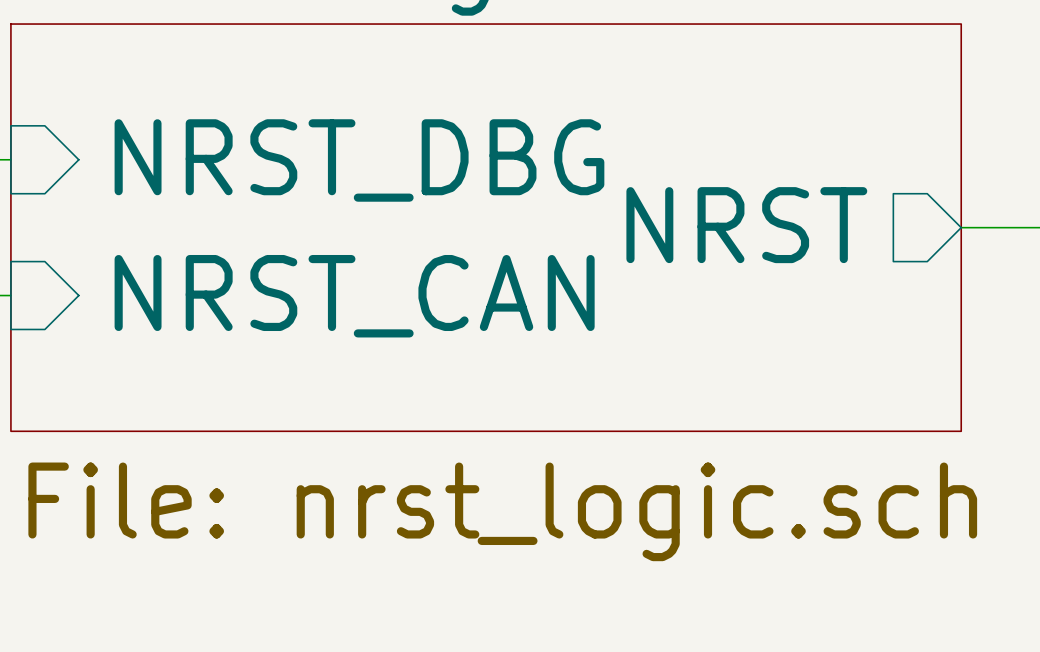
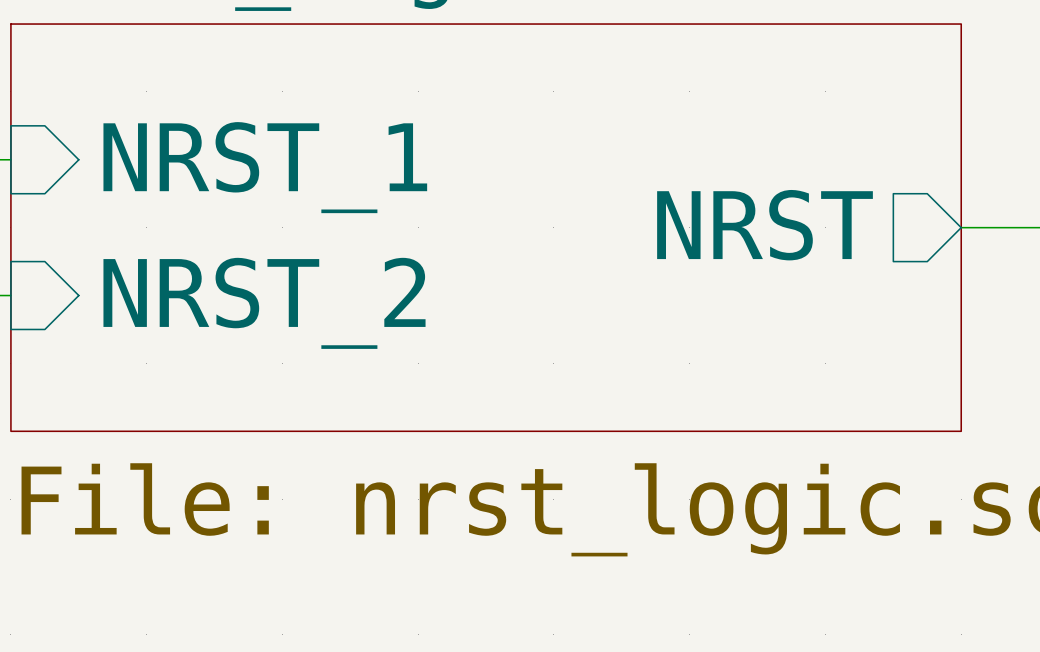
sheet pin: NRST_DBG (359, 160) -> NRST_1 (265, 167)
sheet pin: NRST_CAN (354, 296) -> NRST_2 (264, 303)

